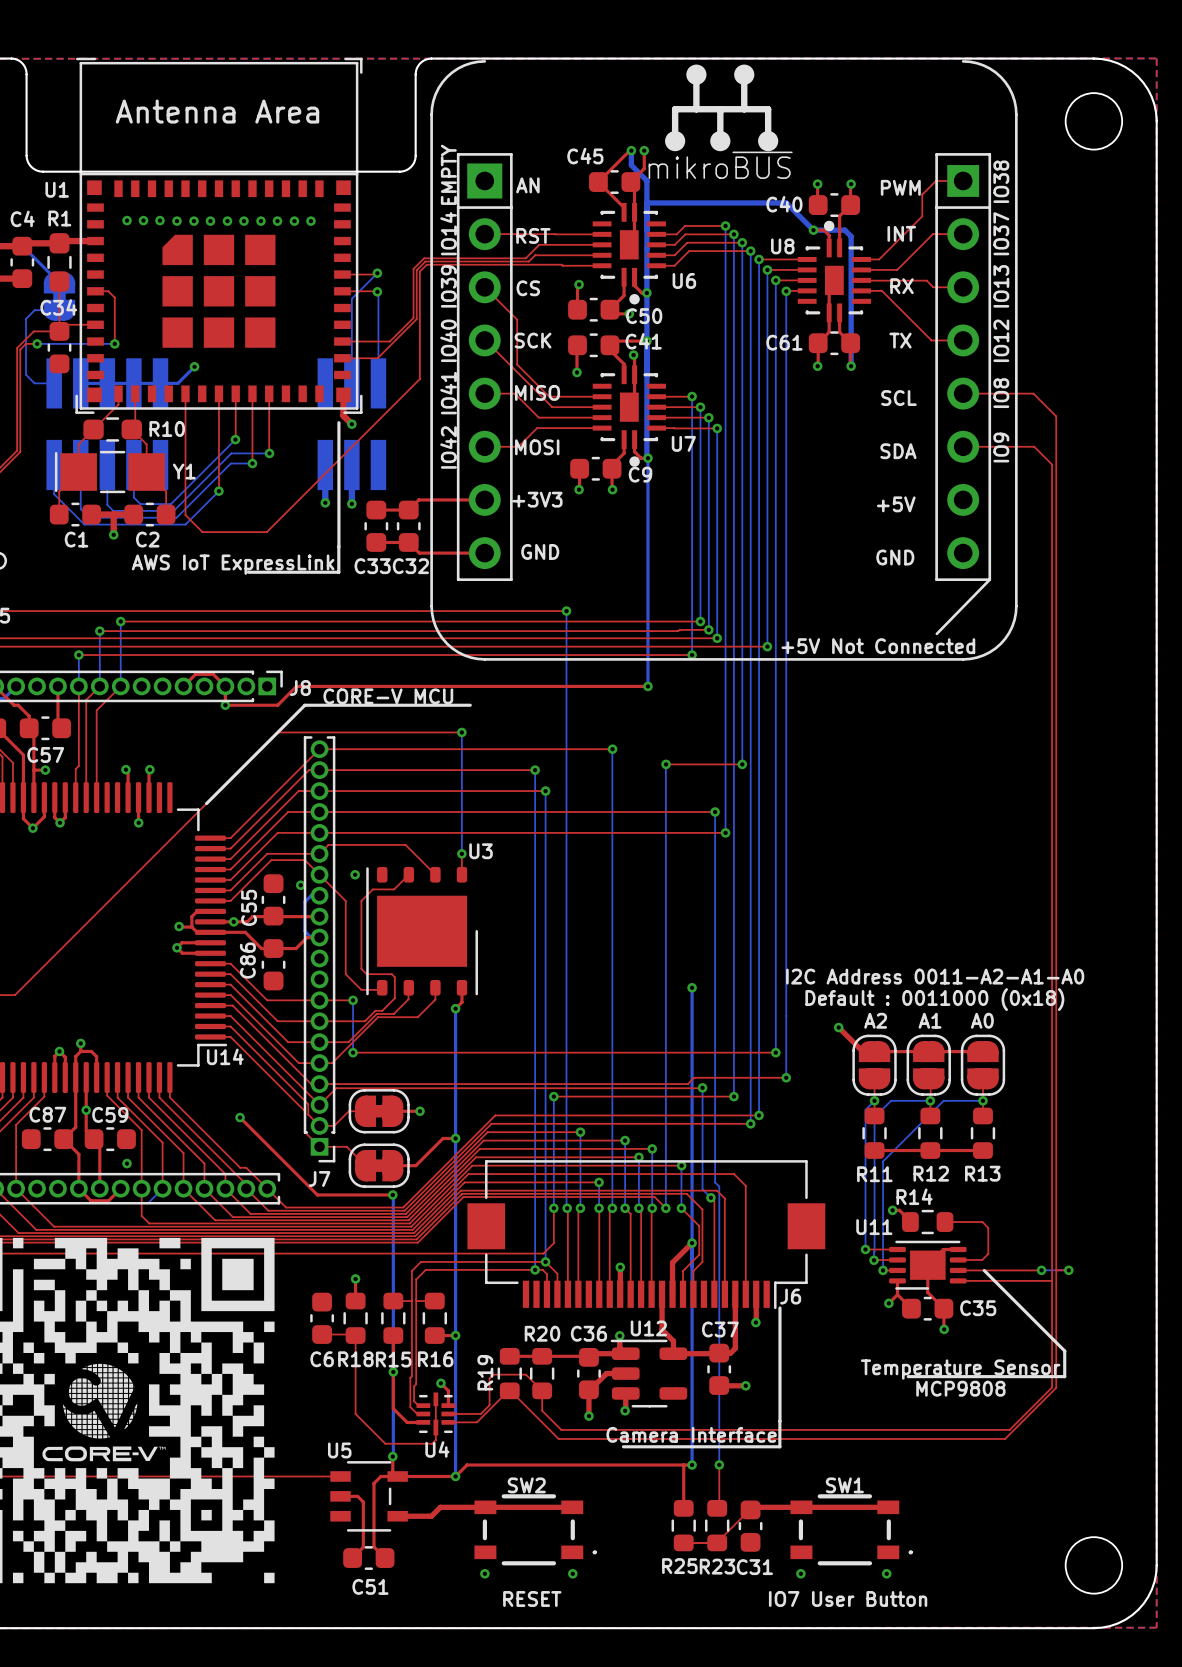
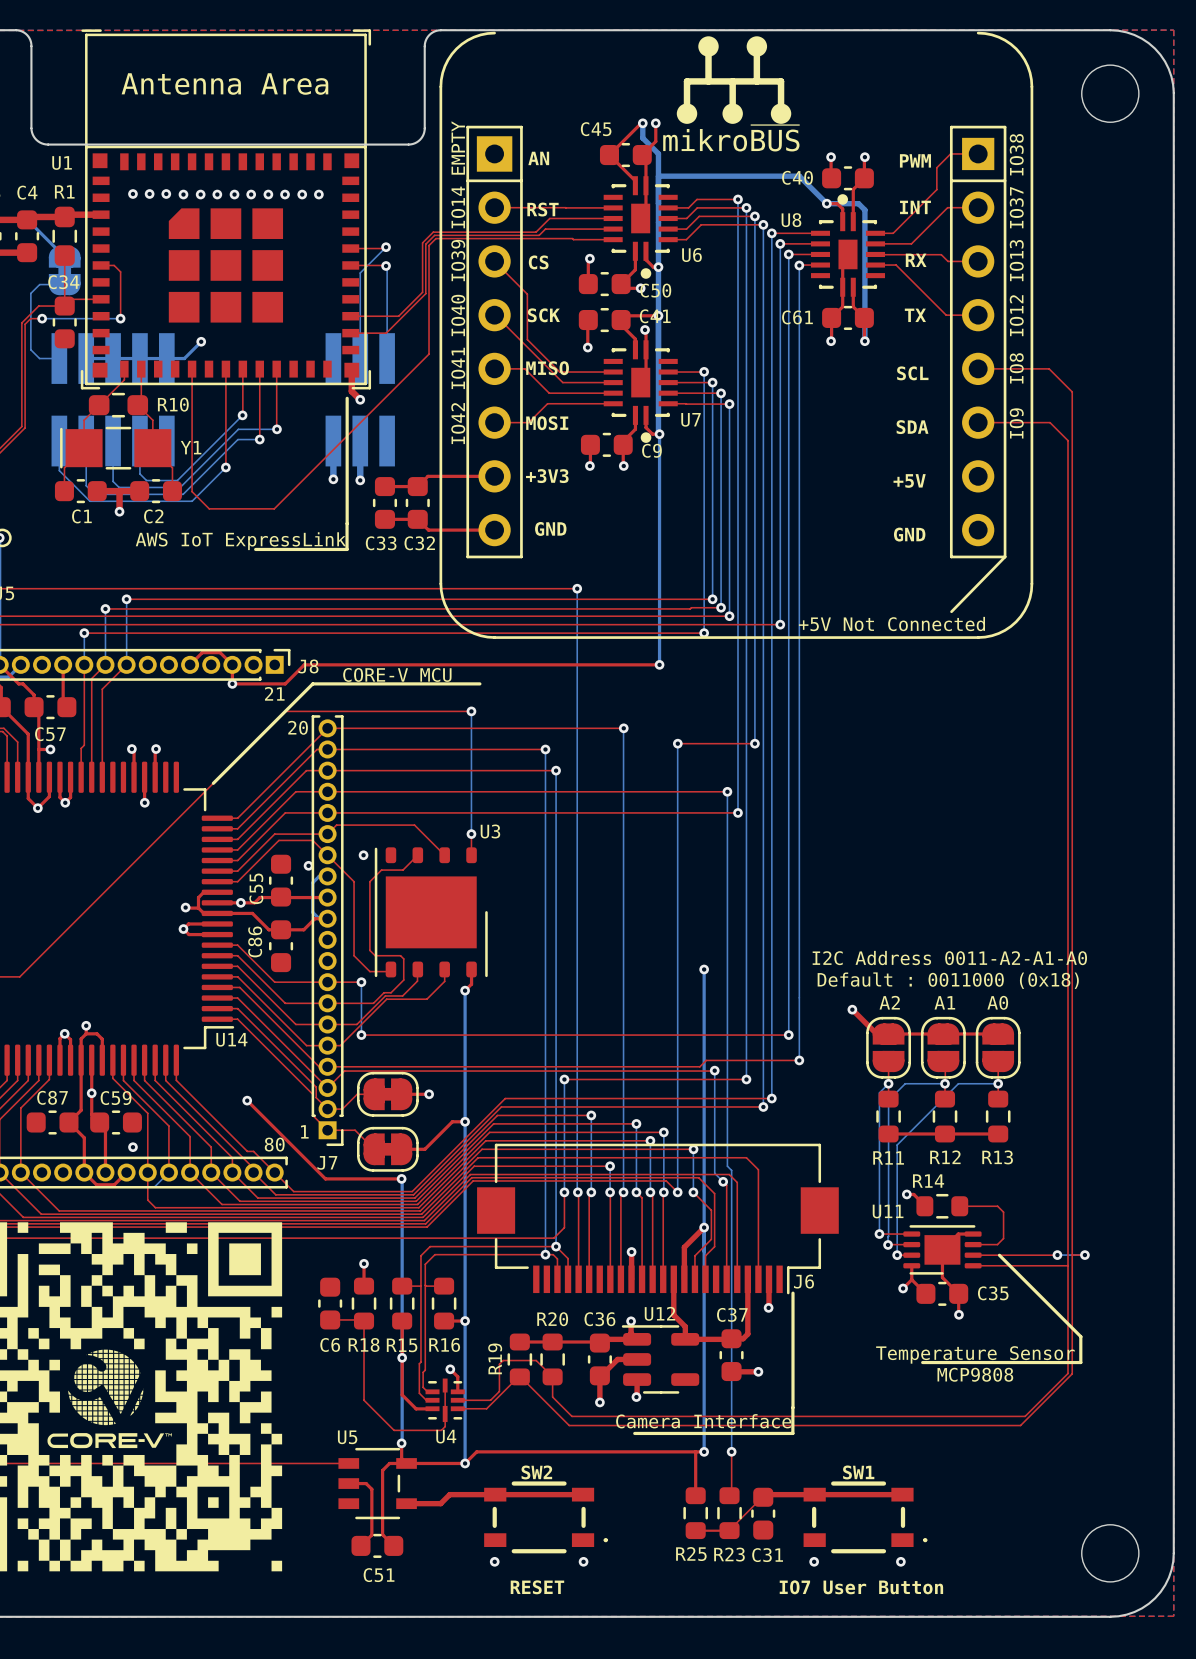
text: none -> 21 (274, 693)
text: none -> 20 (298, 727)
text: none -> 1 (304, 1131)
text: none -> 80 (274, 1144)

